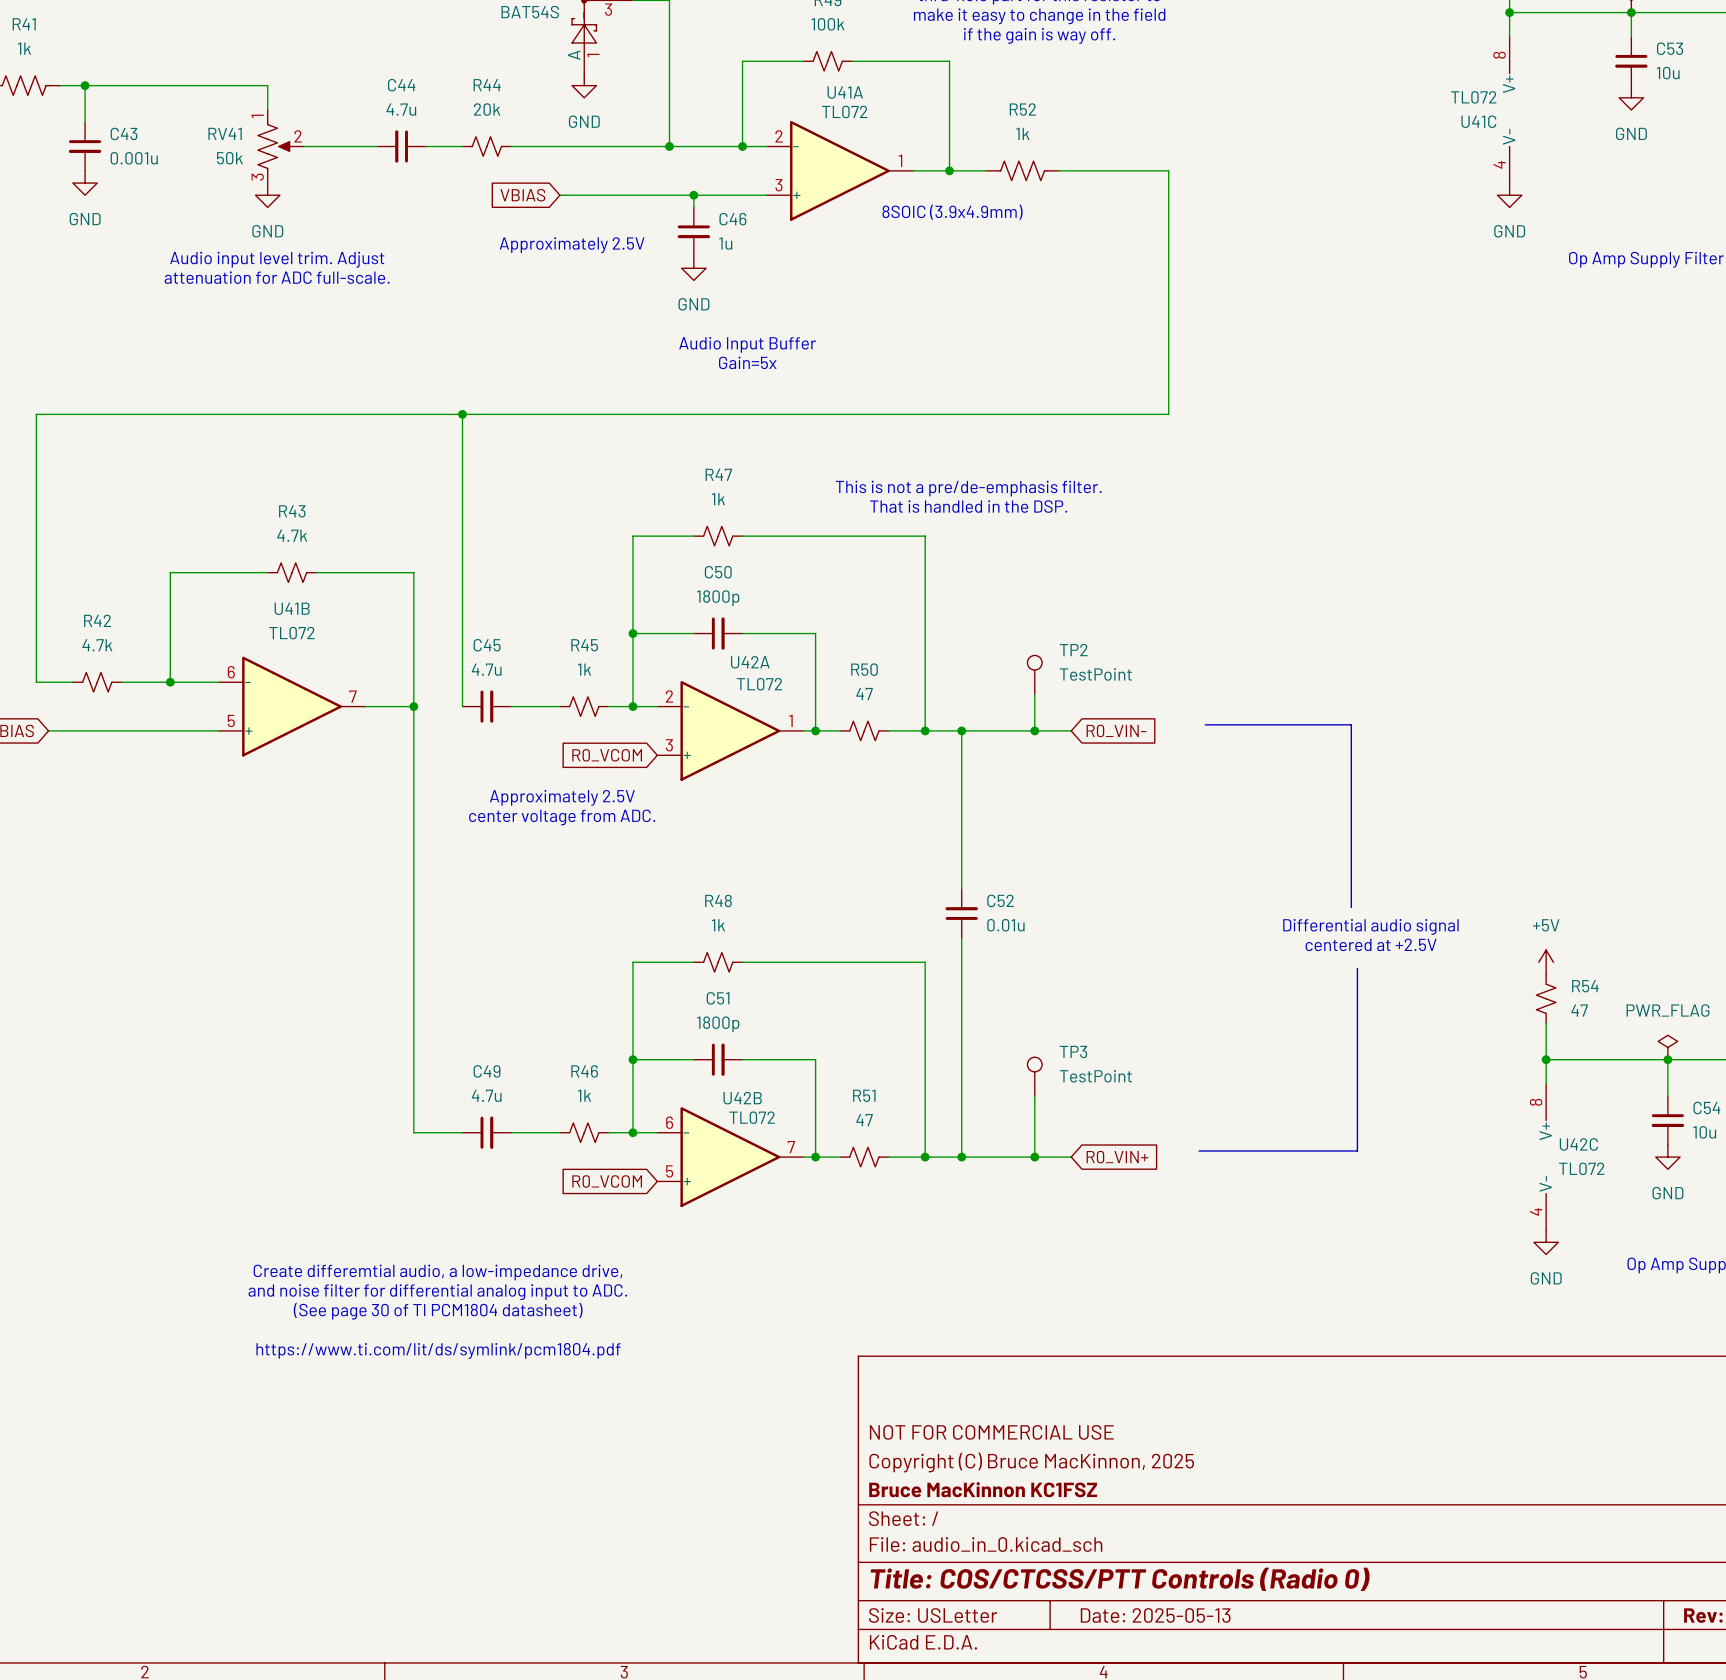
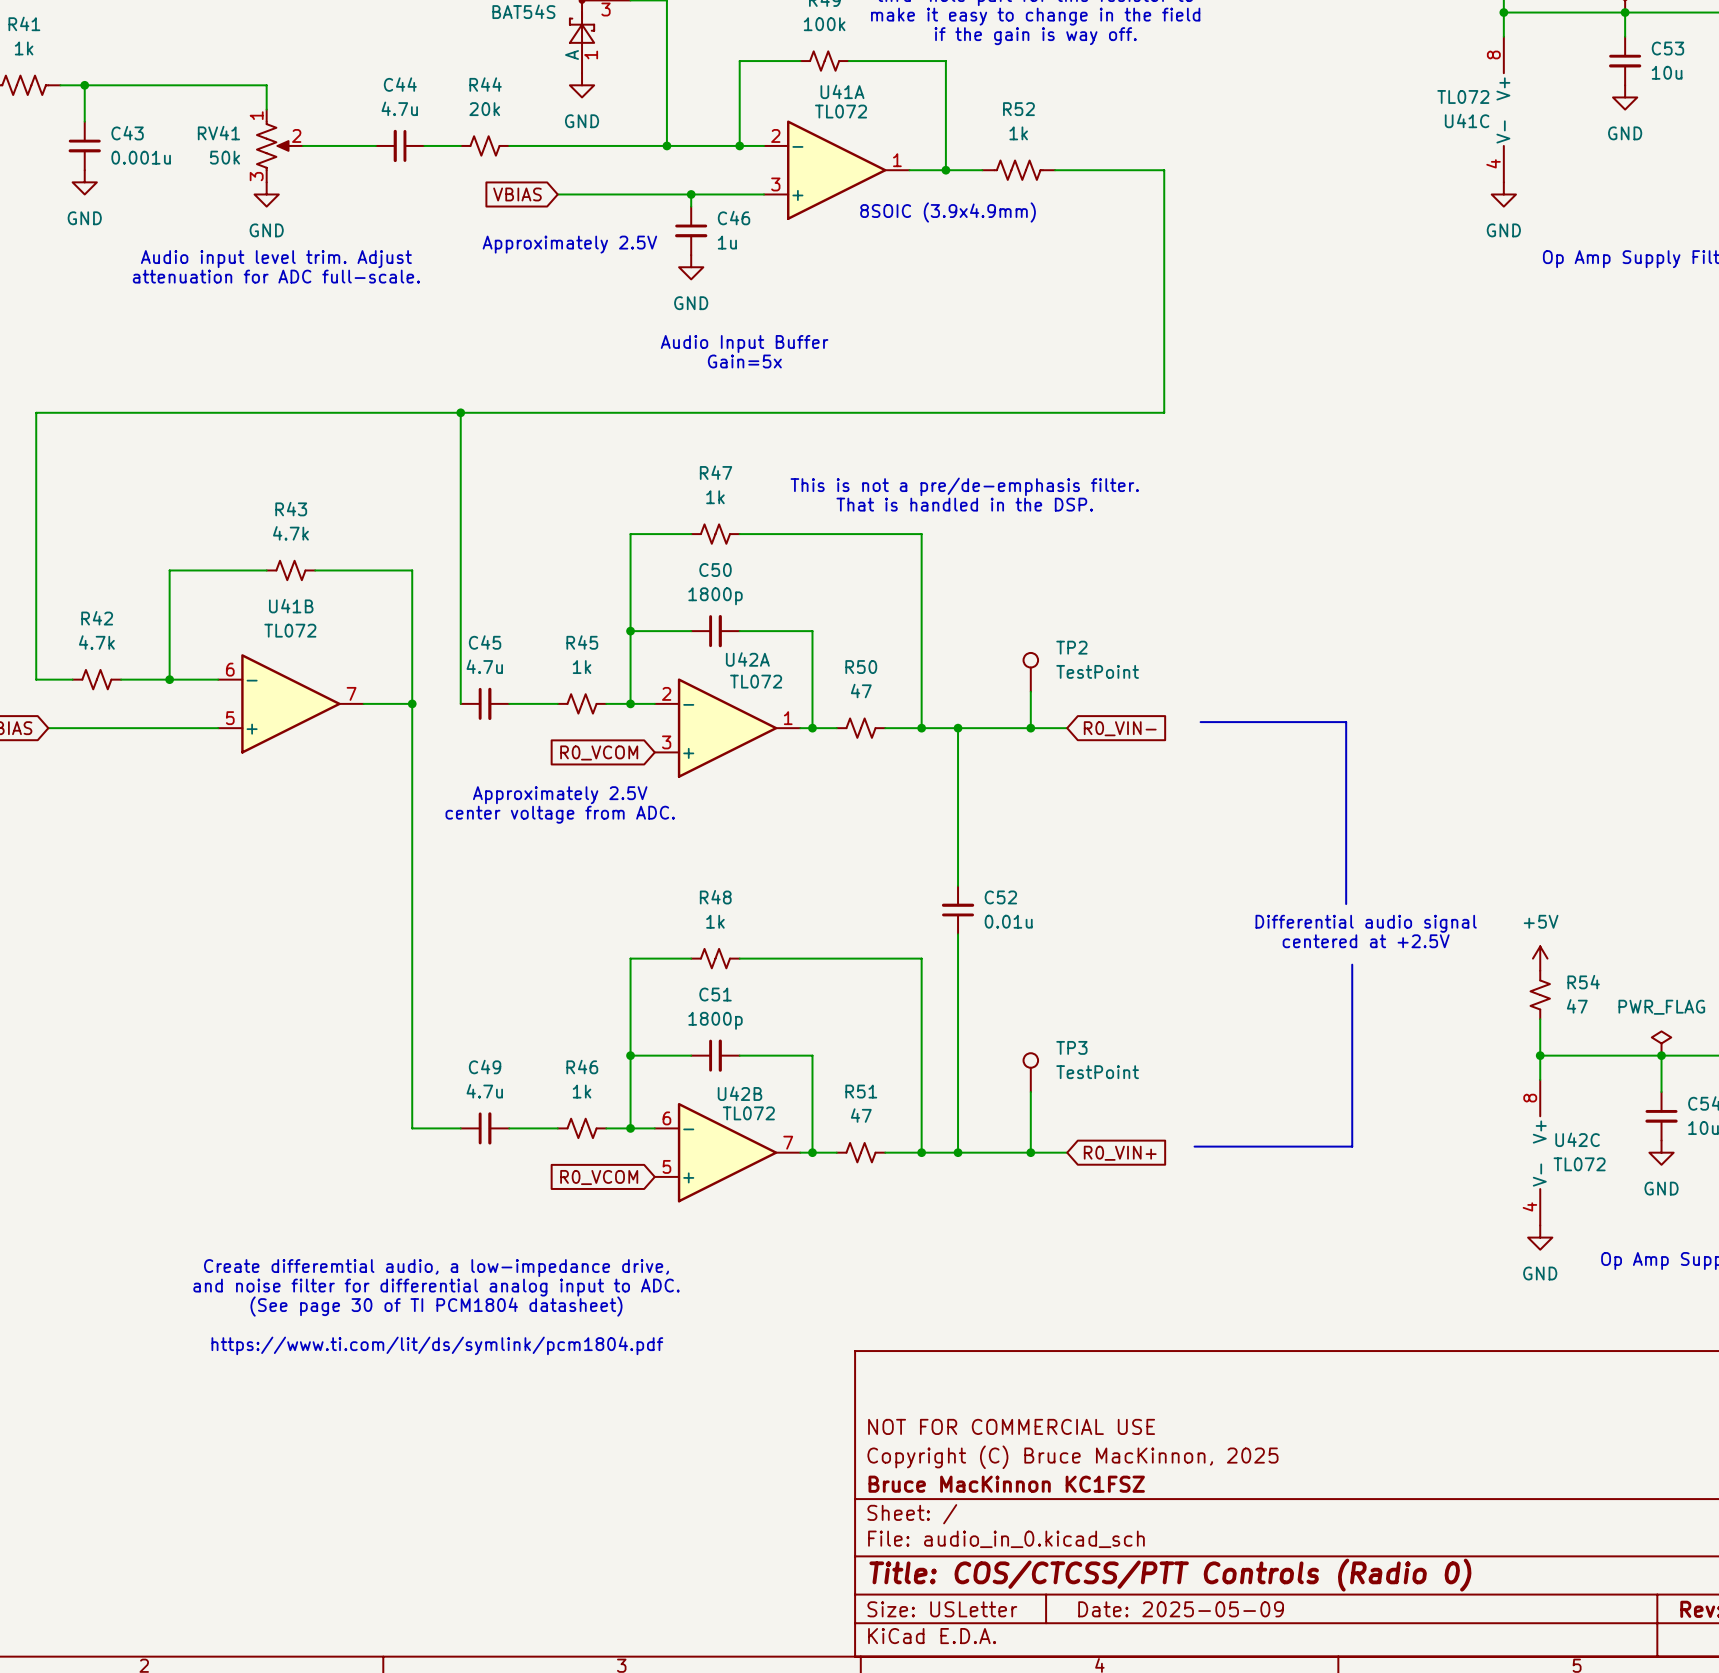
title block: Date: 2025-05-13 (1155, 1615) -> Date: 2025-05-09 (1181, 1609)

